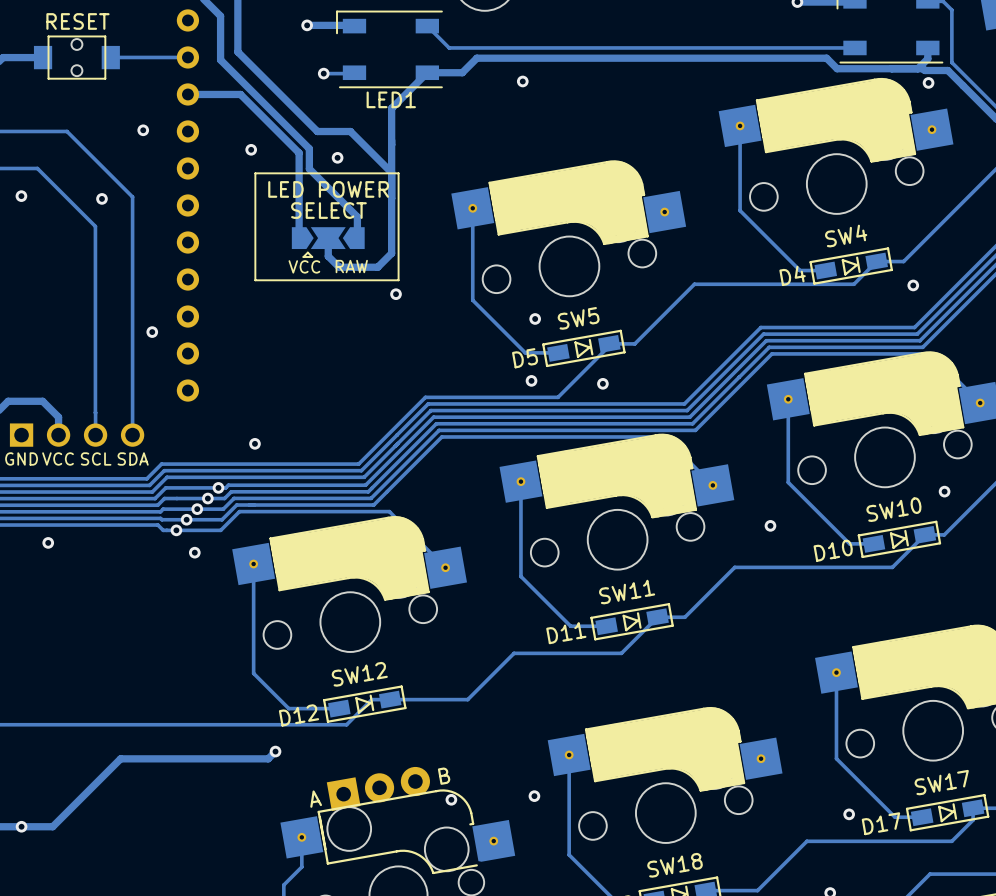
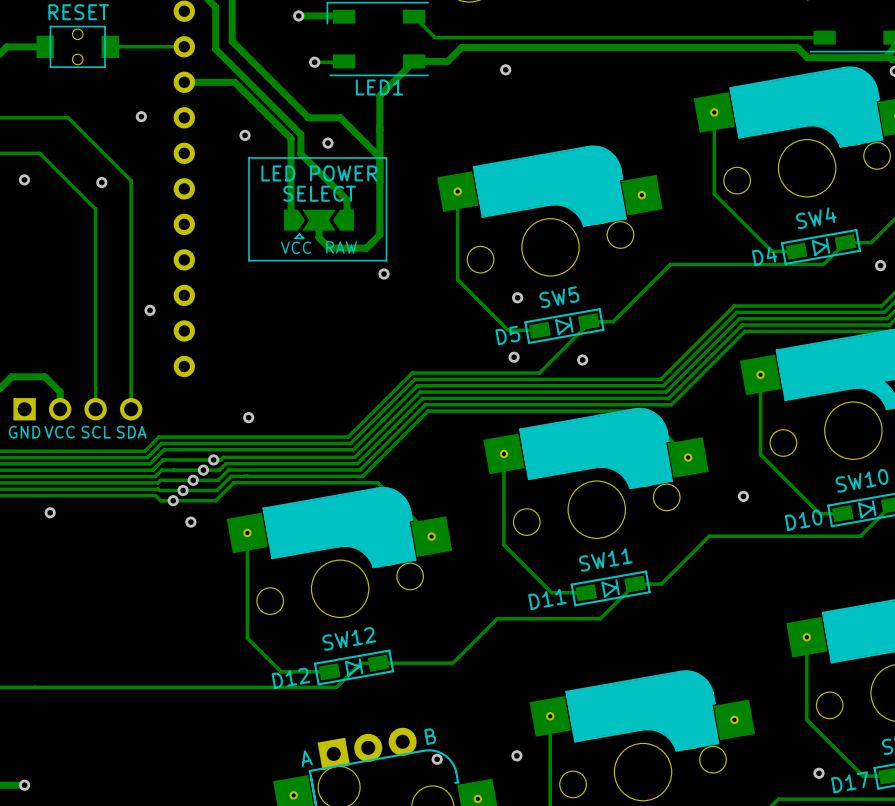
track: (275, 751) (268, 758) (120, 758) (52, 826) (21, 826) -> none
via: (275, 751) -> none

